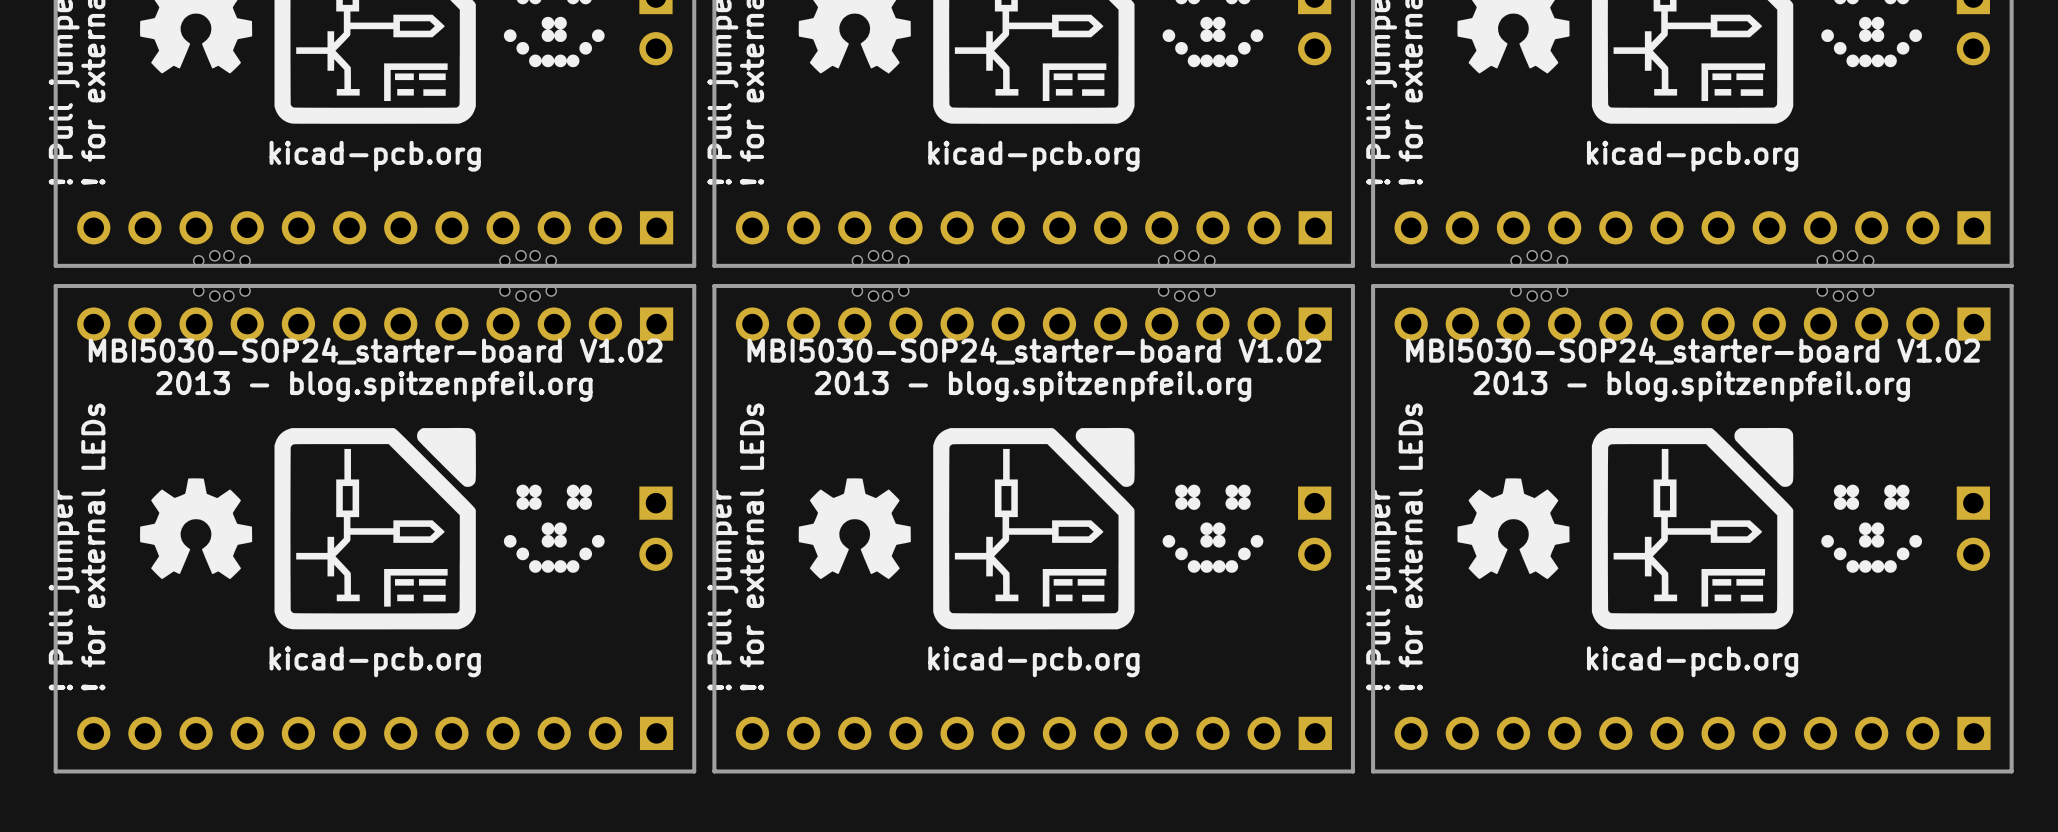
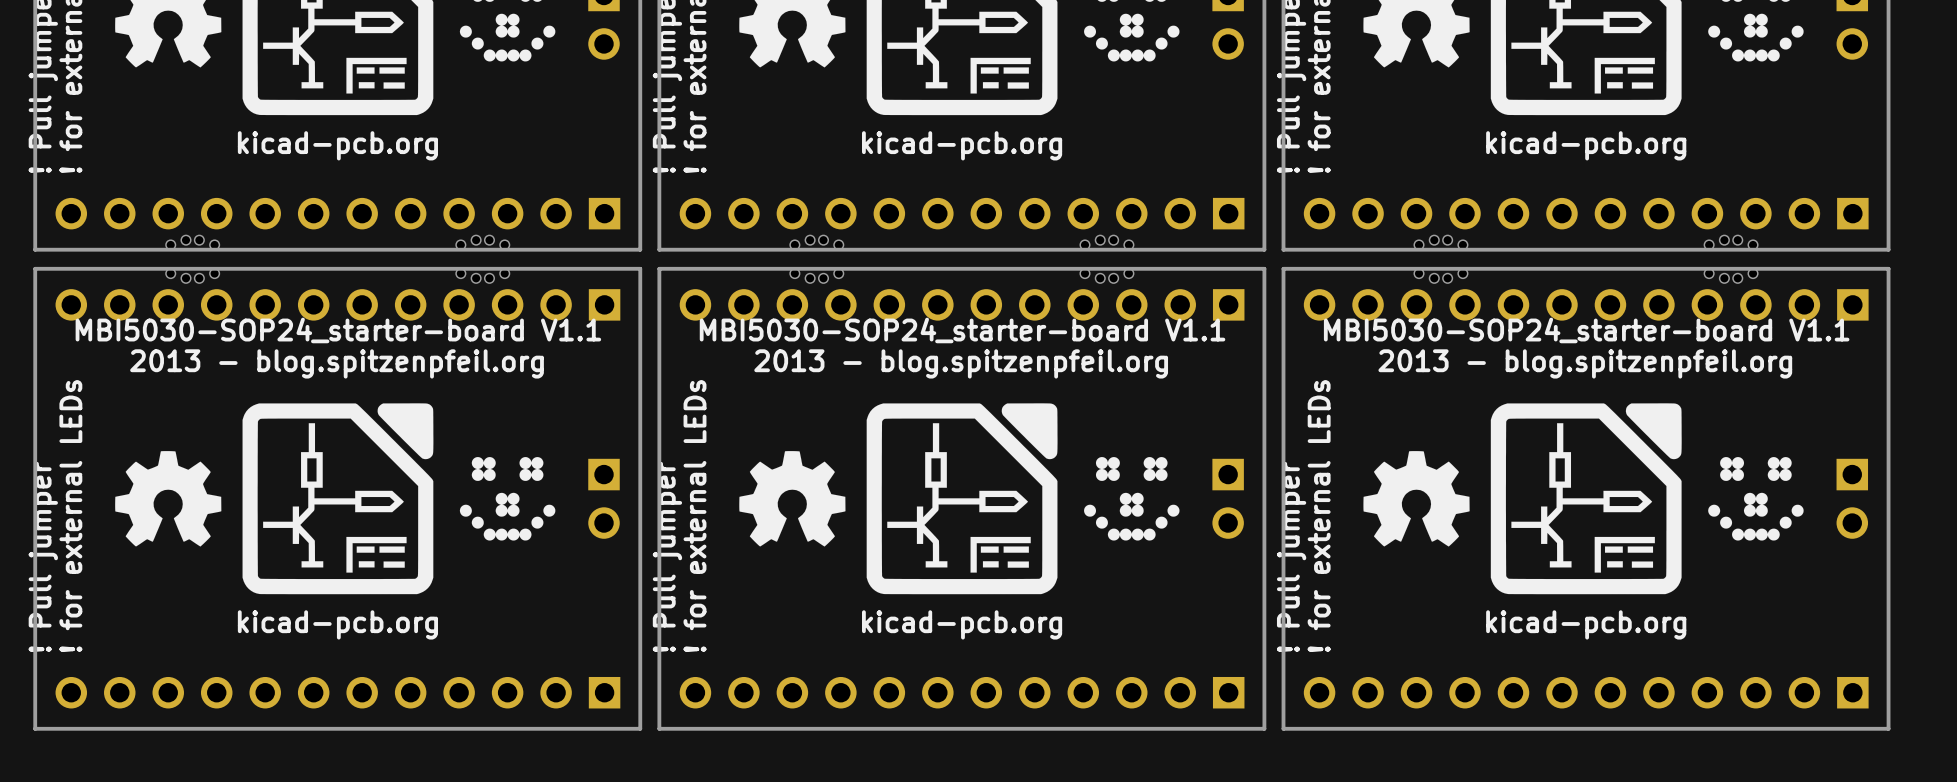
text: MBI5030-SOP24_starter-board V1.02 (375, 351) -> MBI5030-SOP24_starter-board V1.1 (338, 330)
text: MBI5030-SOP24_starter-board V1.02 (1034, 351) -> MBI5030-SOP24_starter-board V1.1 (962, 330)
text: MBI5030-SOP24_starter-board V1.02 (1693, 351) -> MBI5030-SOP24_starter-board V1.1 (1586, 330)

